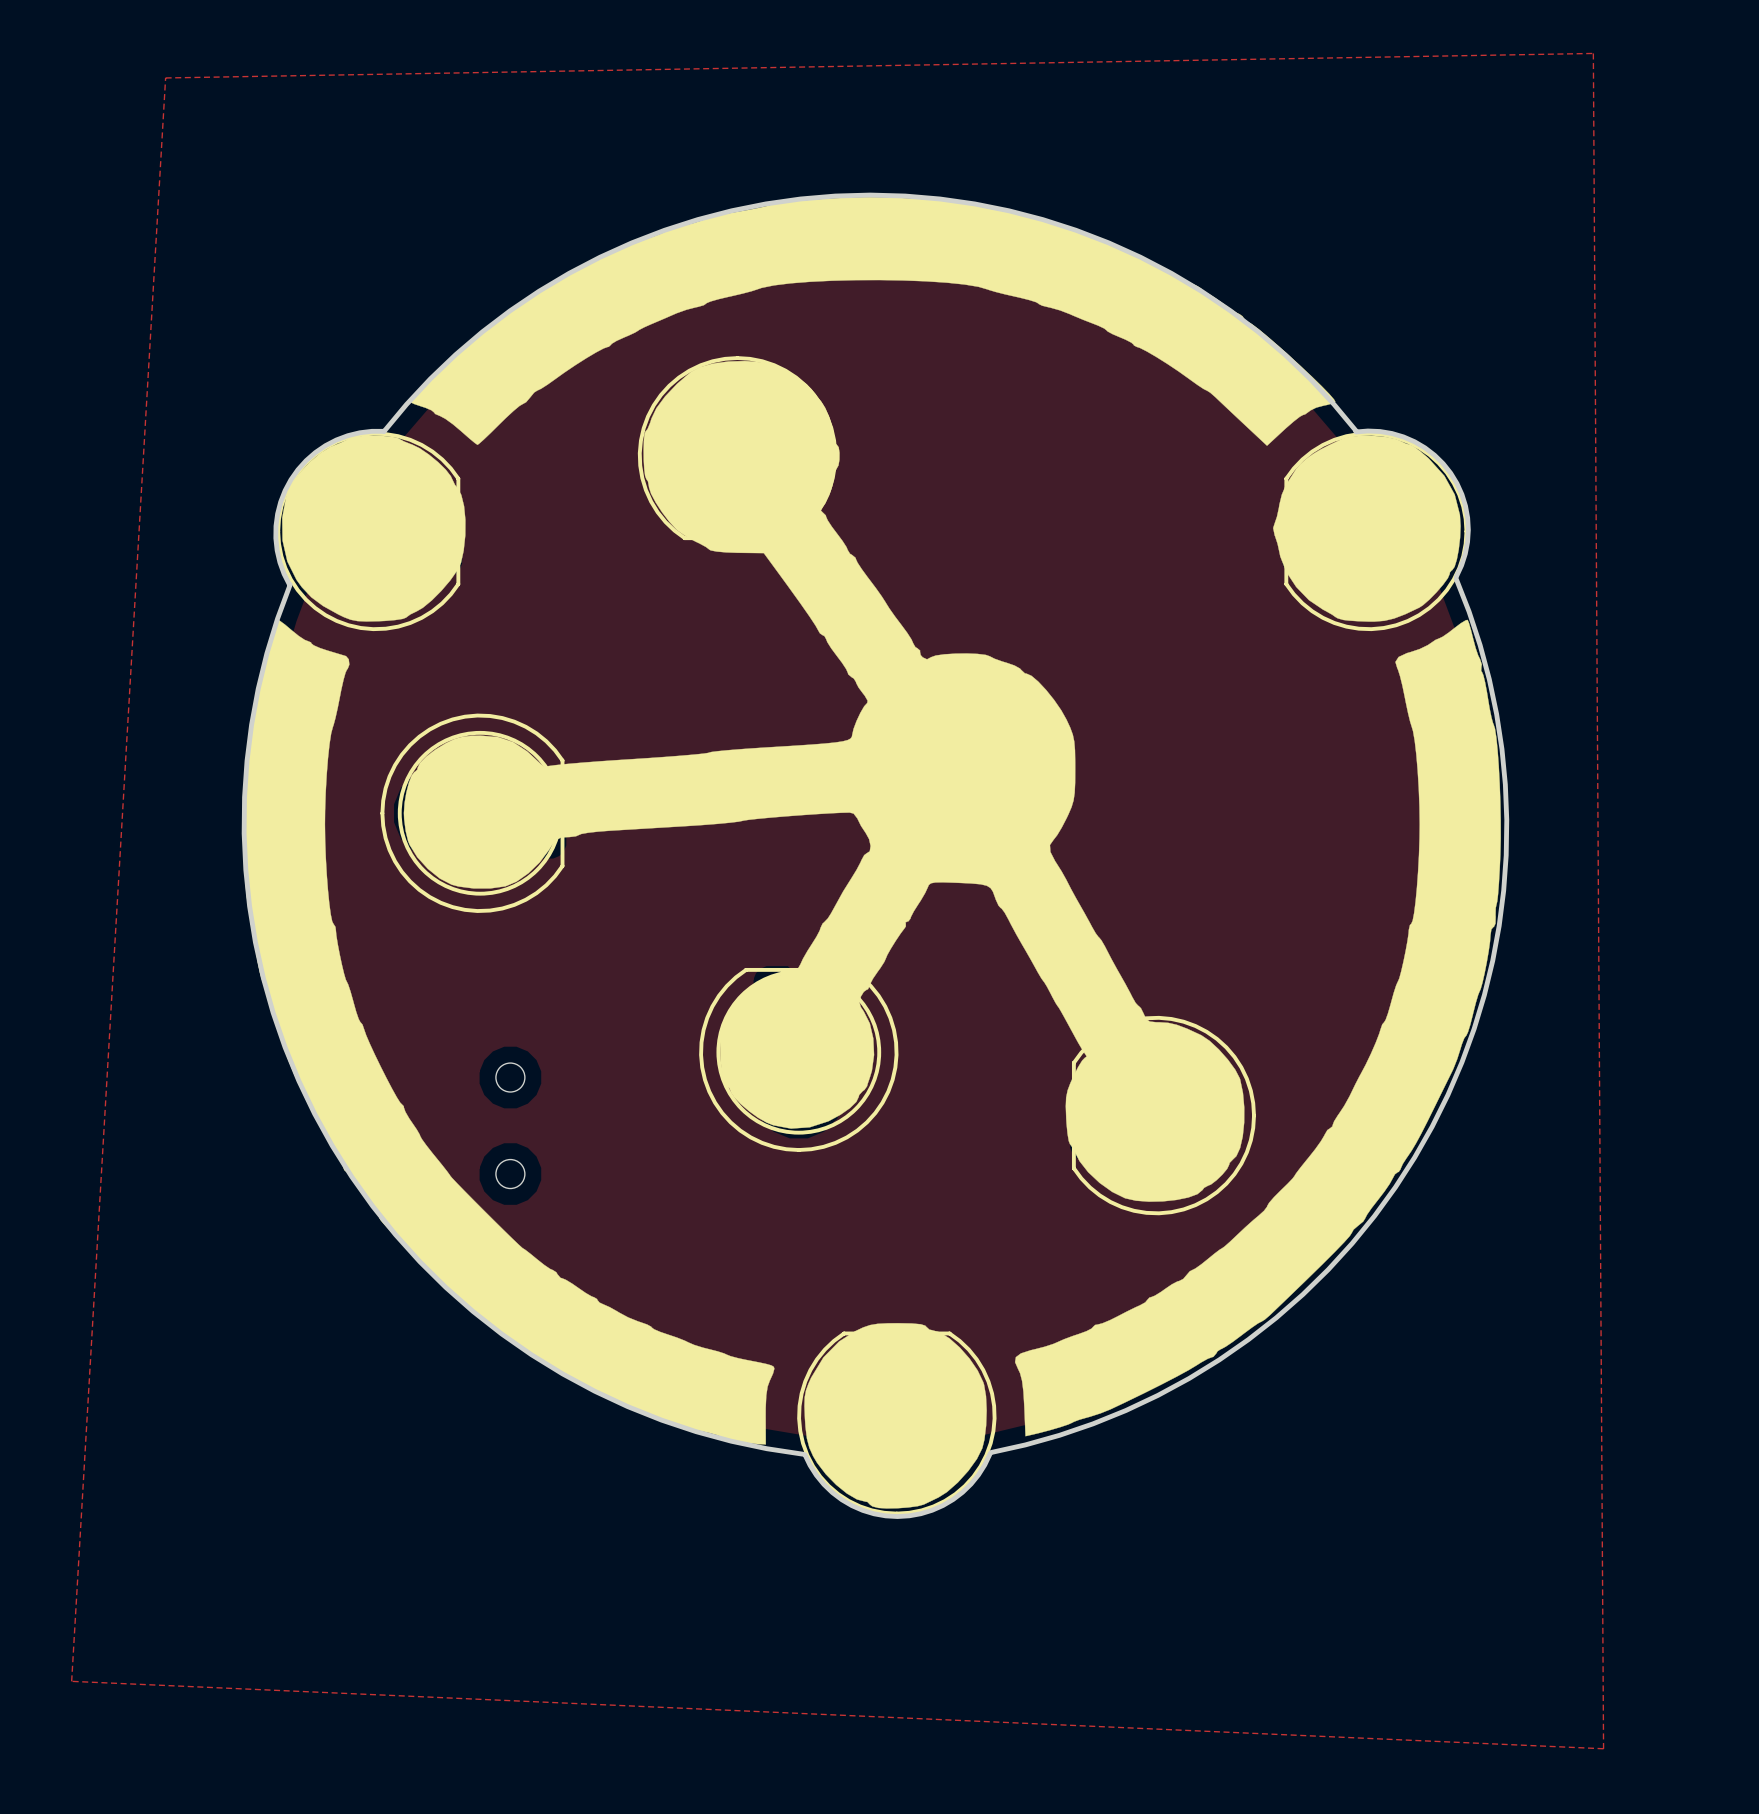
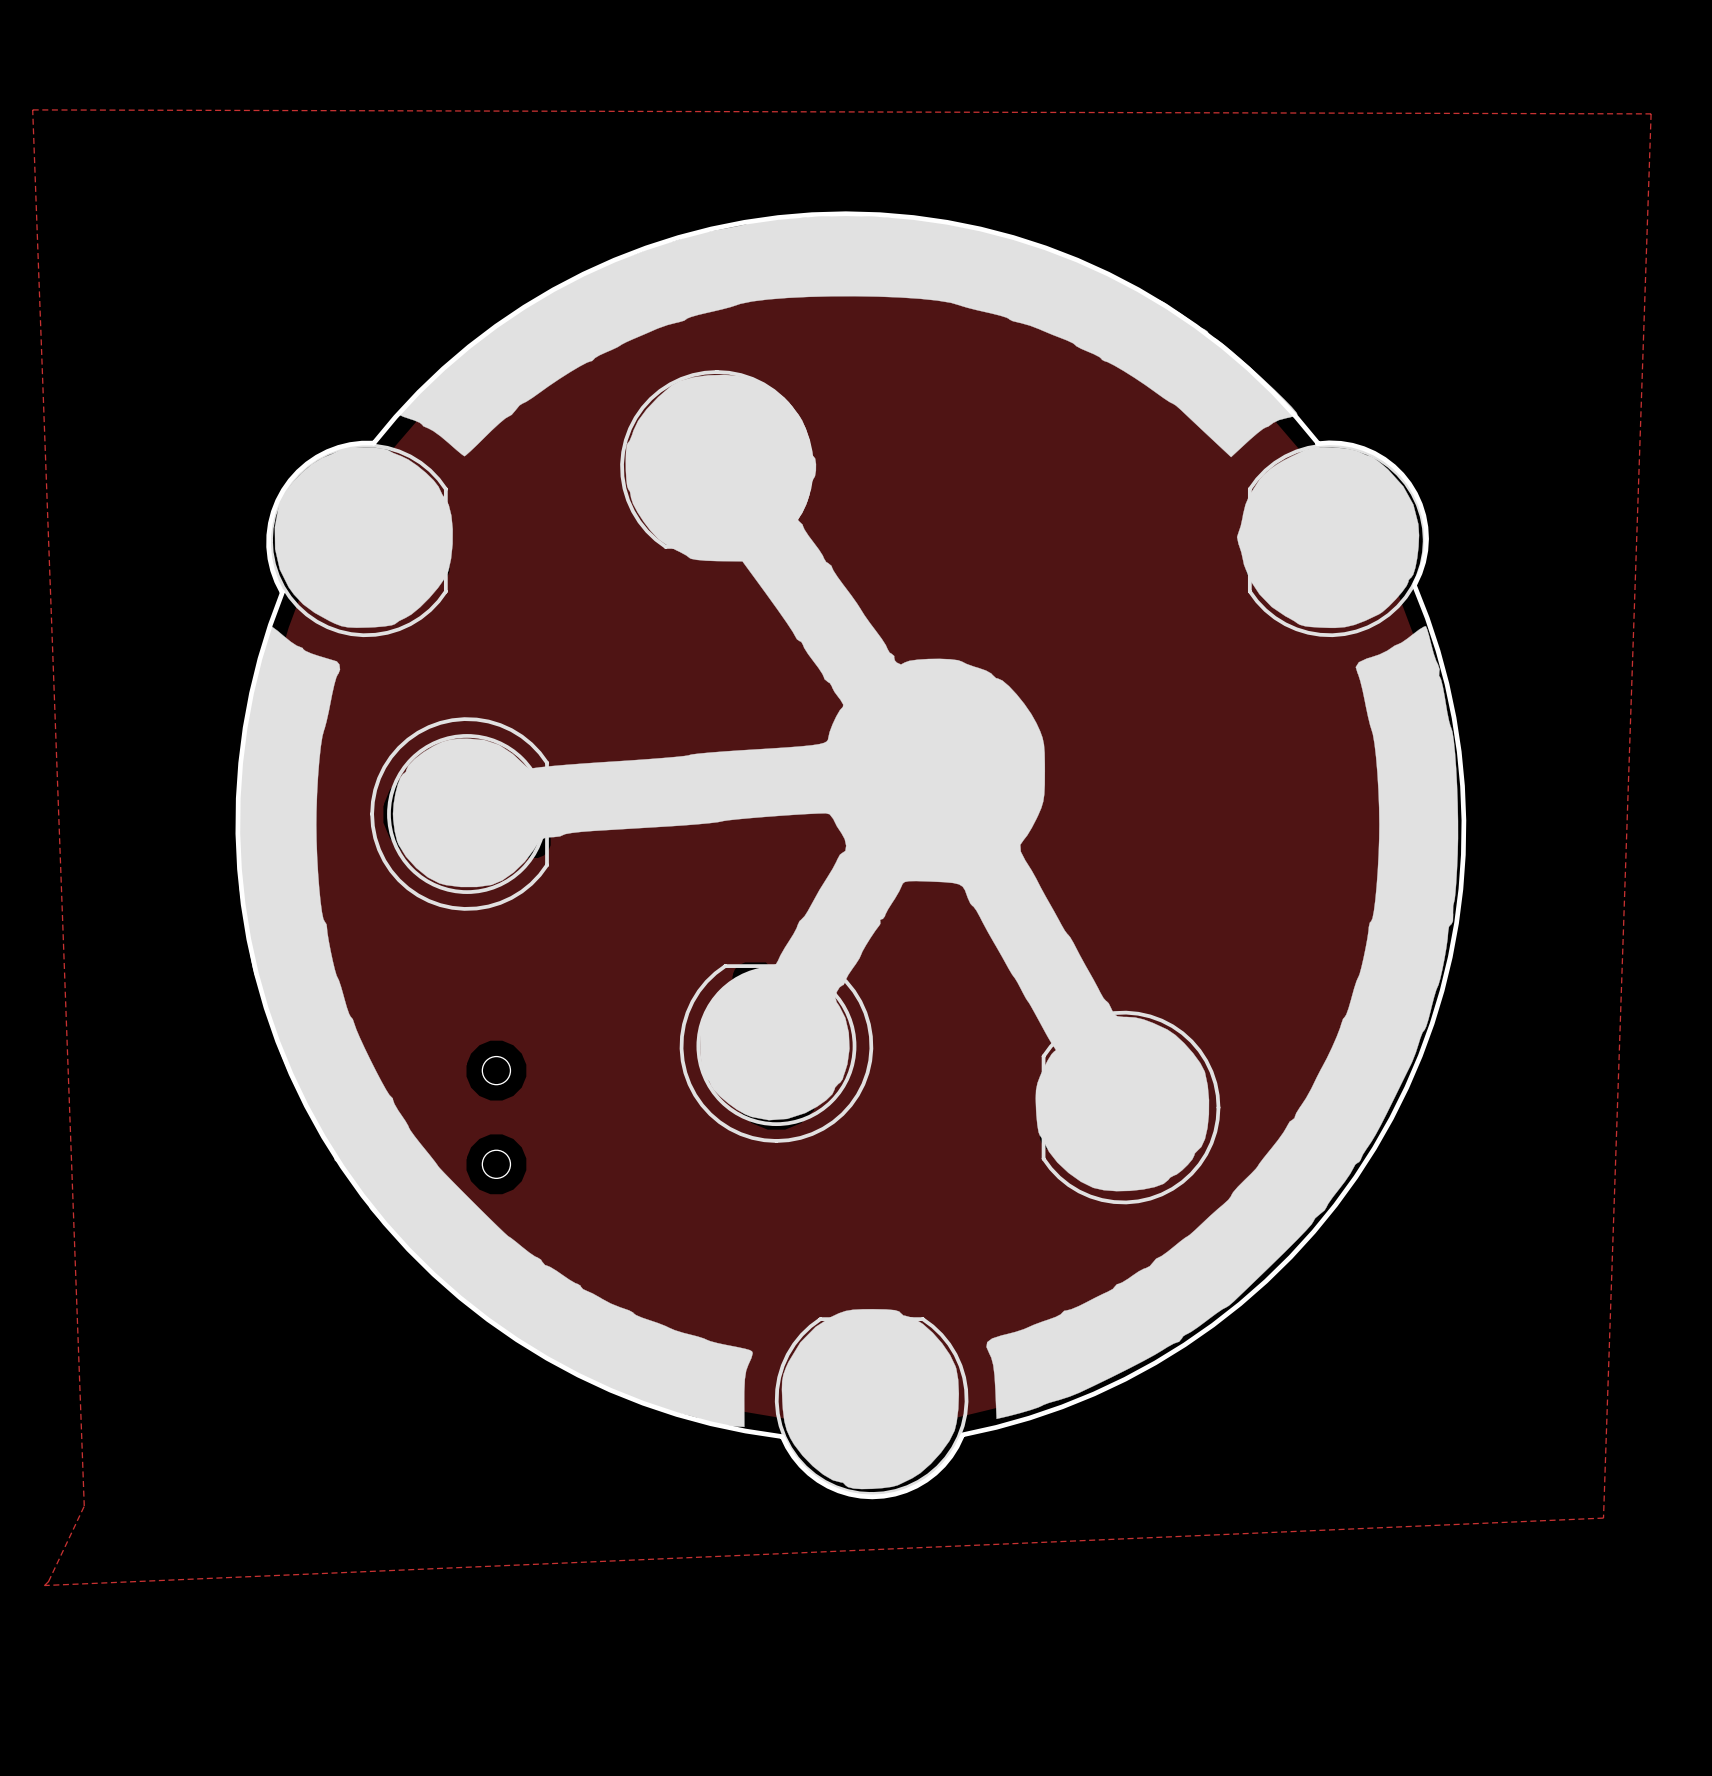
zone outline: (1593, 53) (165, 77) (71, 1681) (1603, 1748) (1593, 53) -> (32, 109) (84, 1506) (48, 1581) (44, 1585) (1603, 1518) (1651, 113) (32, 109)

